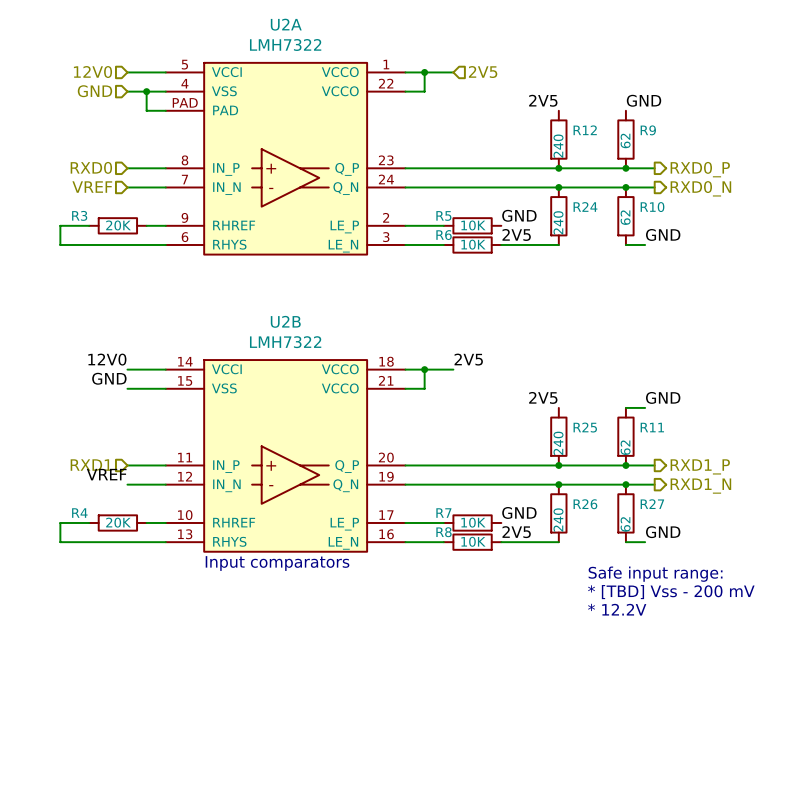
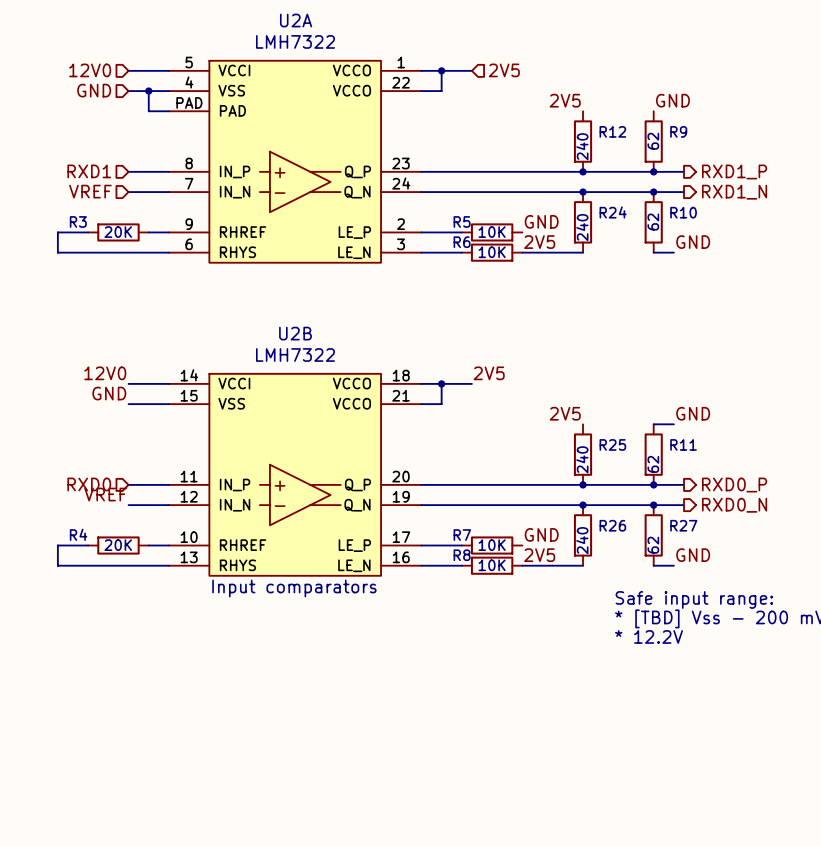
hierarchical label: RXD0 (91, 167) -> RXD1 (89, 171)
hierarchical label: RXD0_P (700, 169) -> RXD1_P (734, 171)
hierarchical label: RXD0_N (700, 188) -> RXD1_N (734, 192)
hierarchical label: RXD1 (91, 465) -> RXD0 (89, 484)
hierarchical label: RXD1_P (700, 466) -> RXD0_P (734, 485)
hierarchical label: RXD1_N (700, 486) -> RXD0_N (734, 505)

